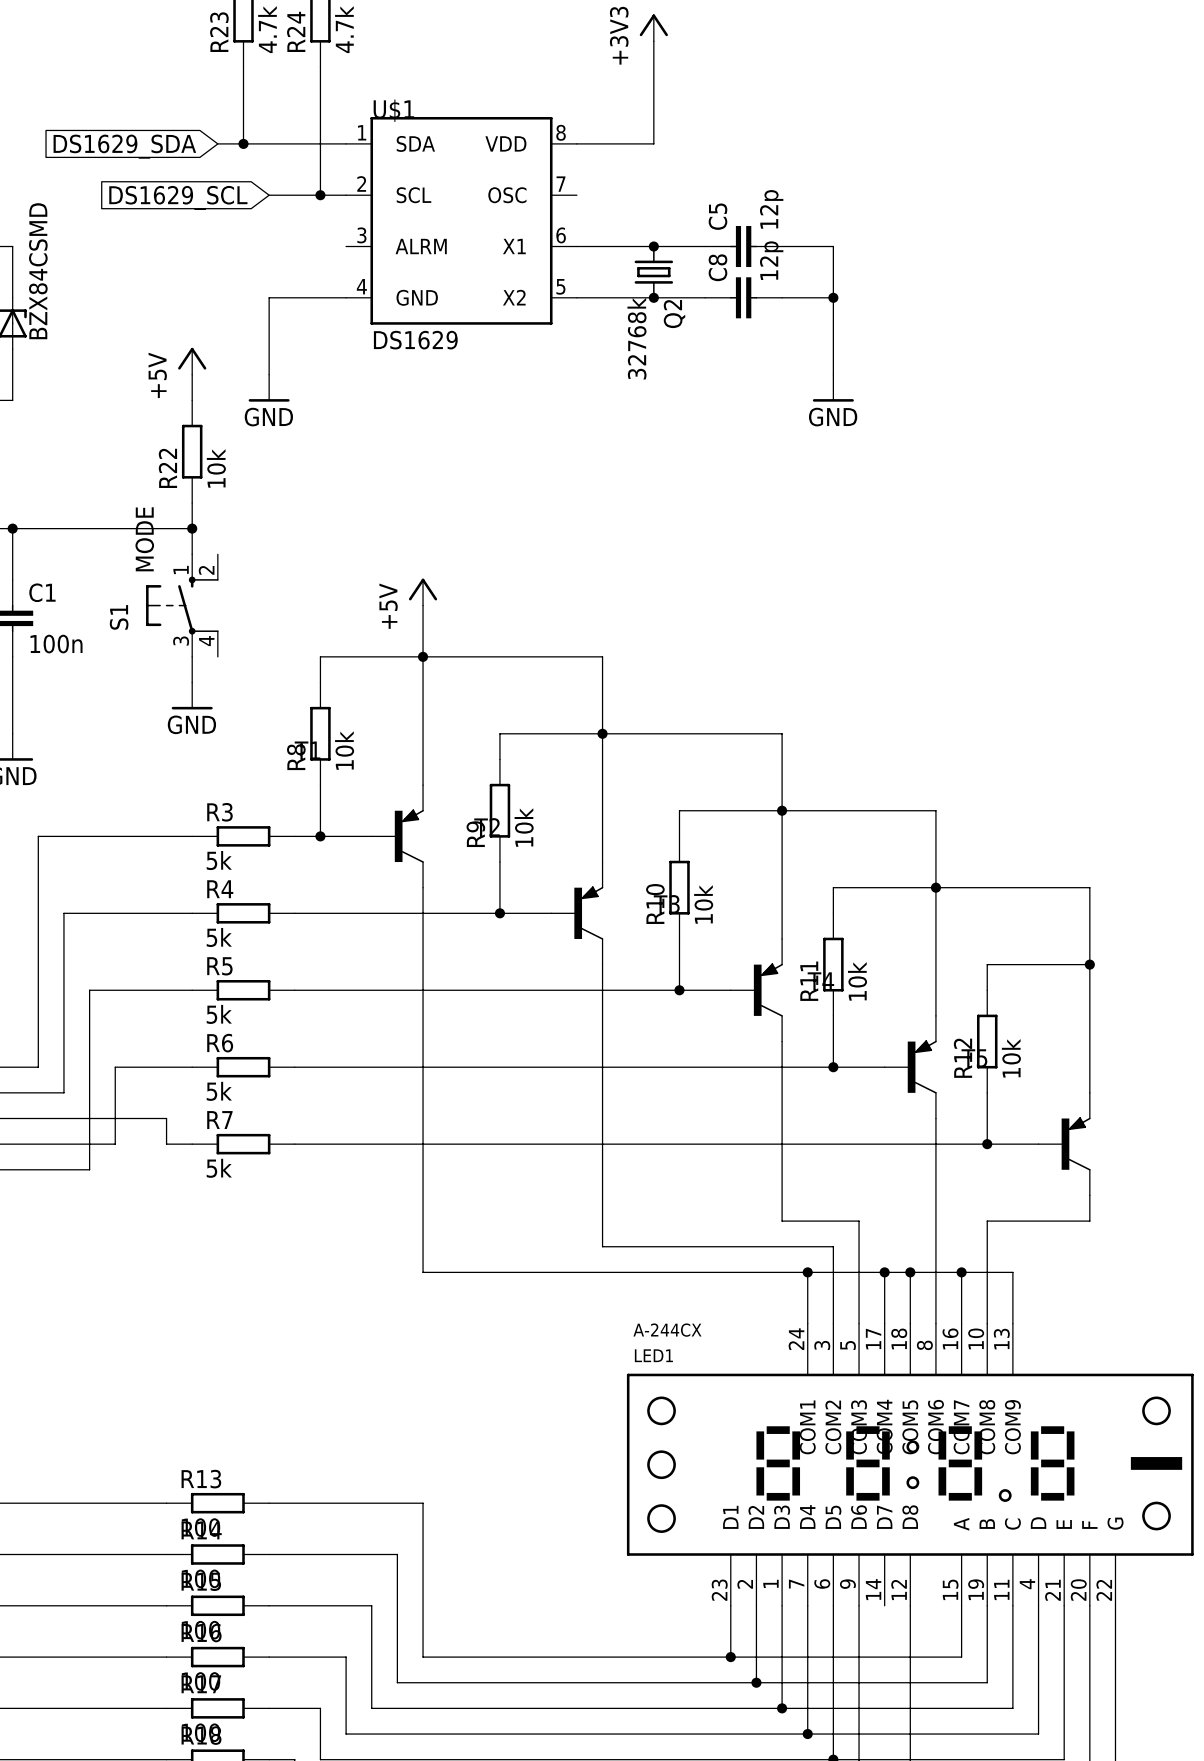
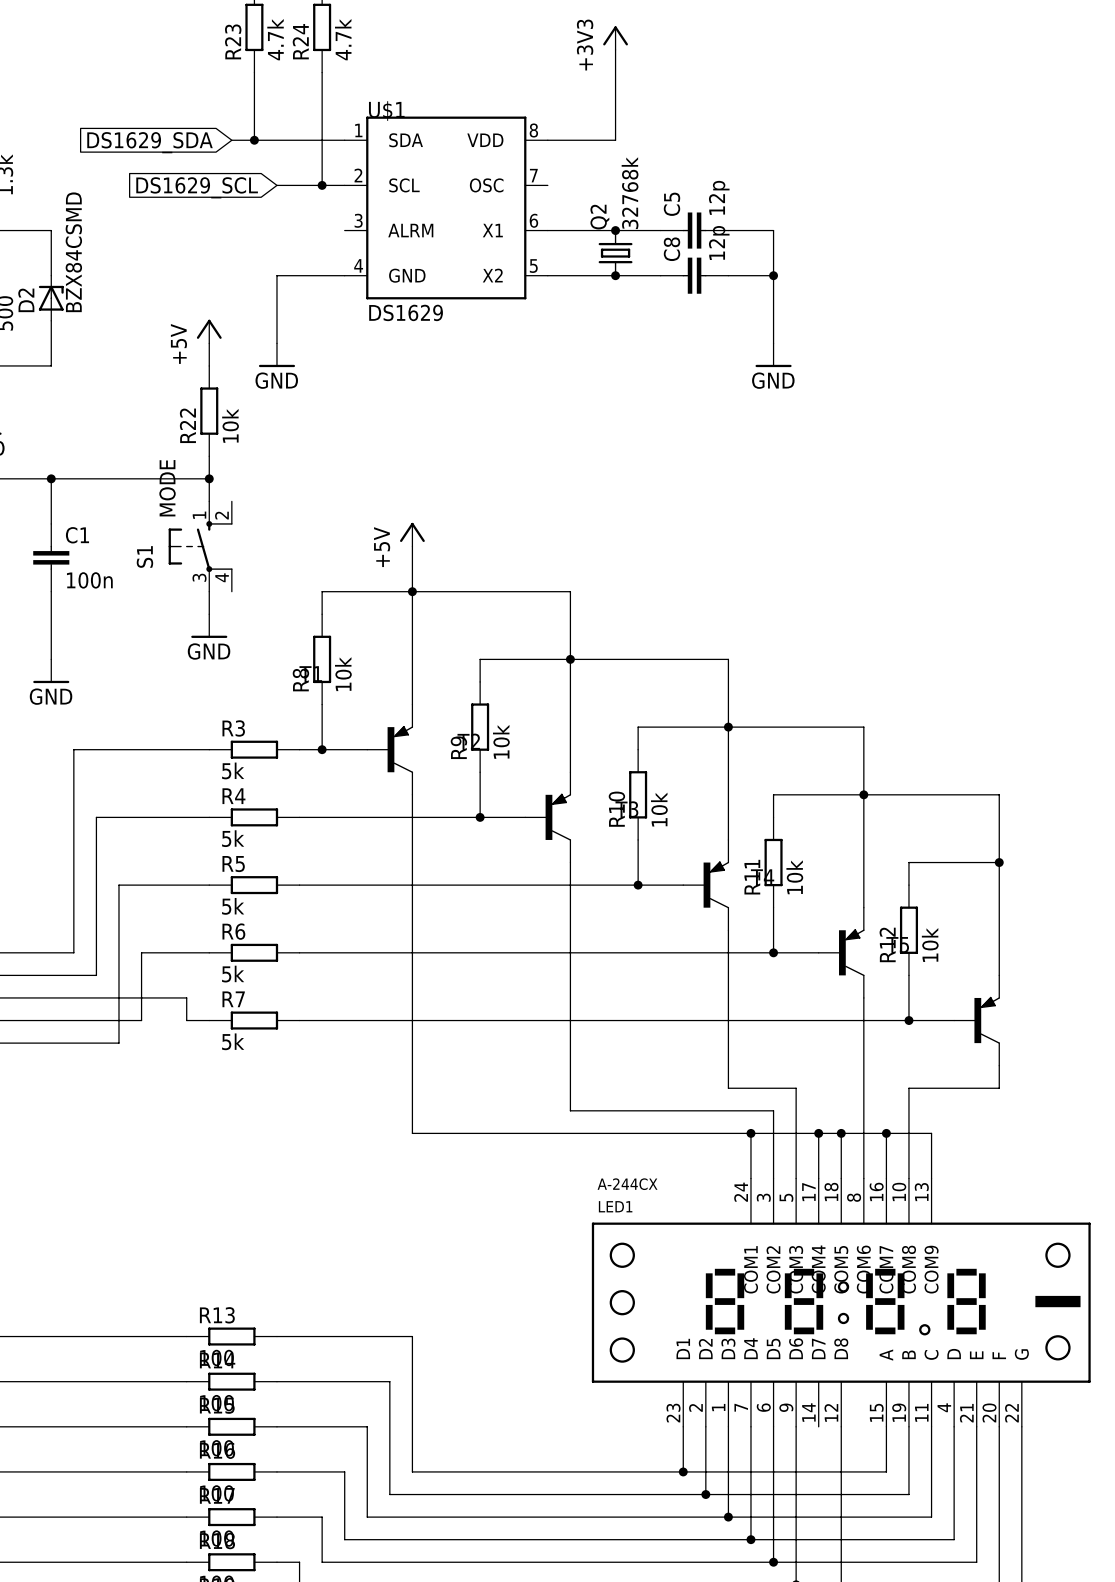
Q2 name position: Q2 (674, 314) -> Q2 (599, 217)
Q2 value position: 32768k (636, 338) -> 32768k (630, 193)

